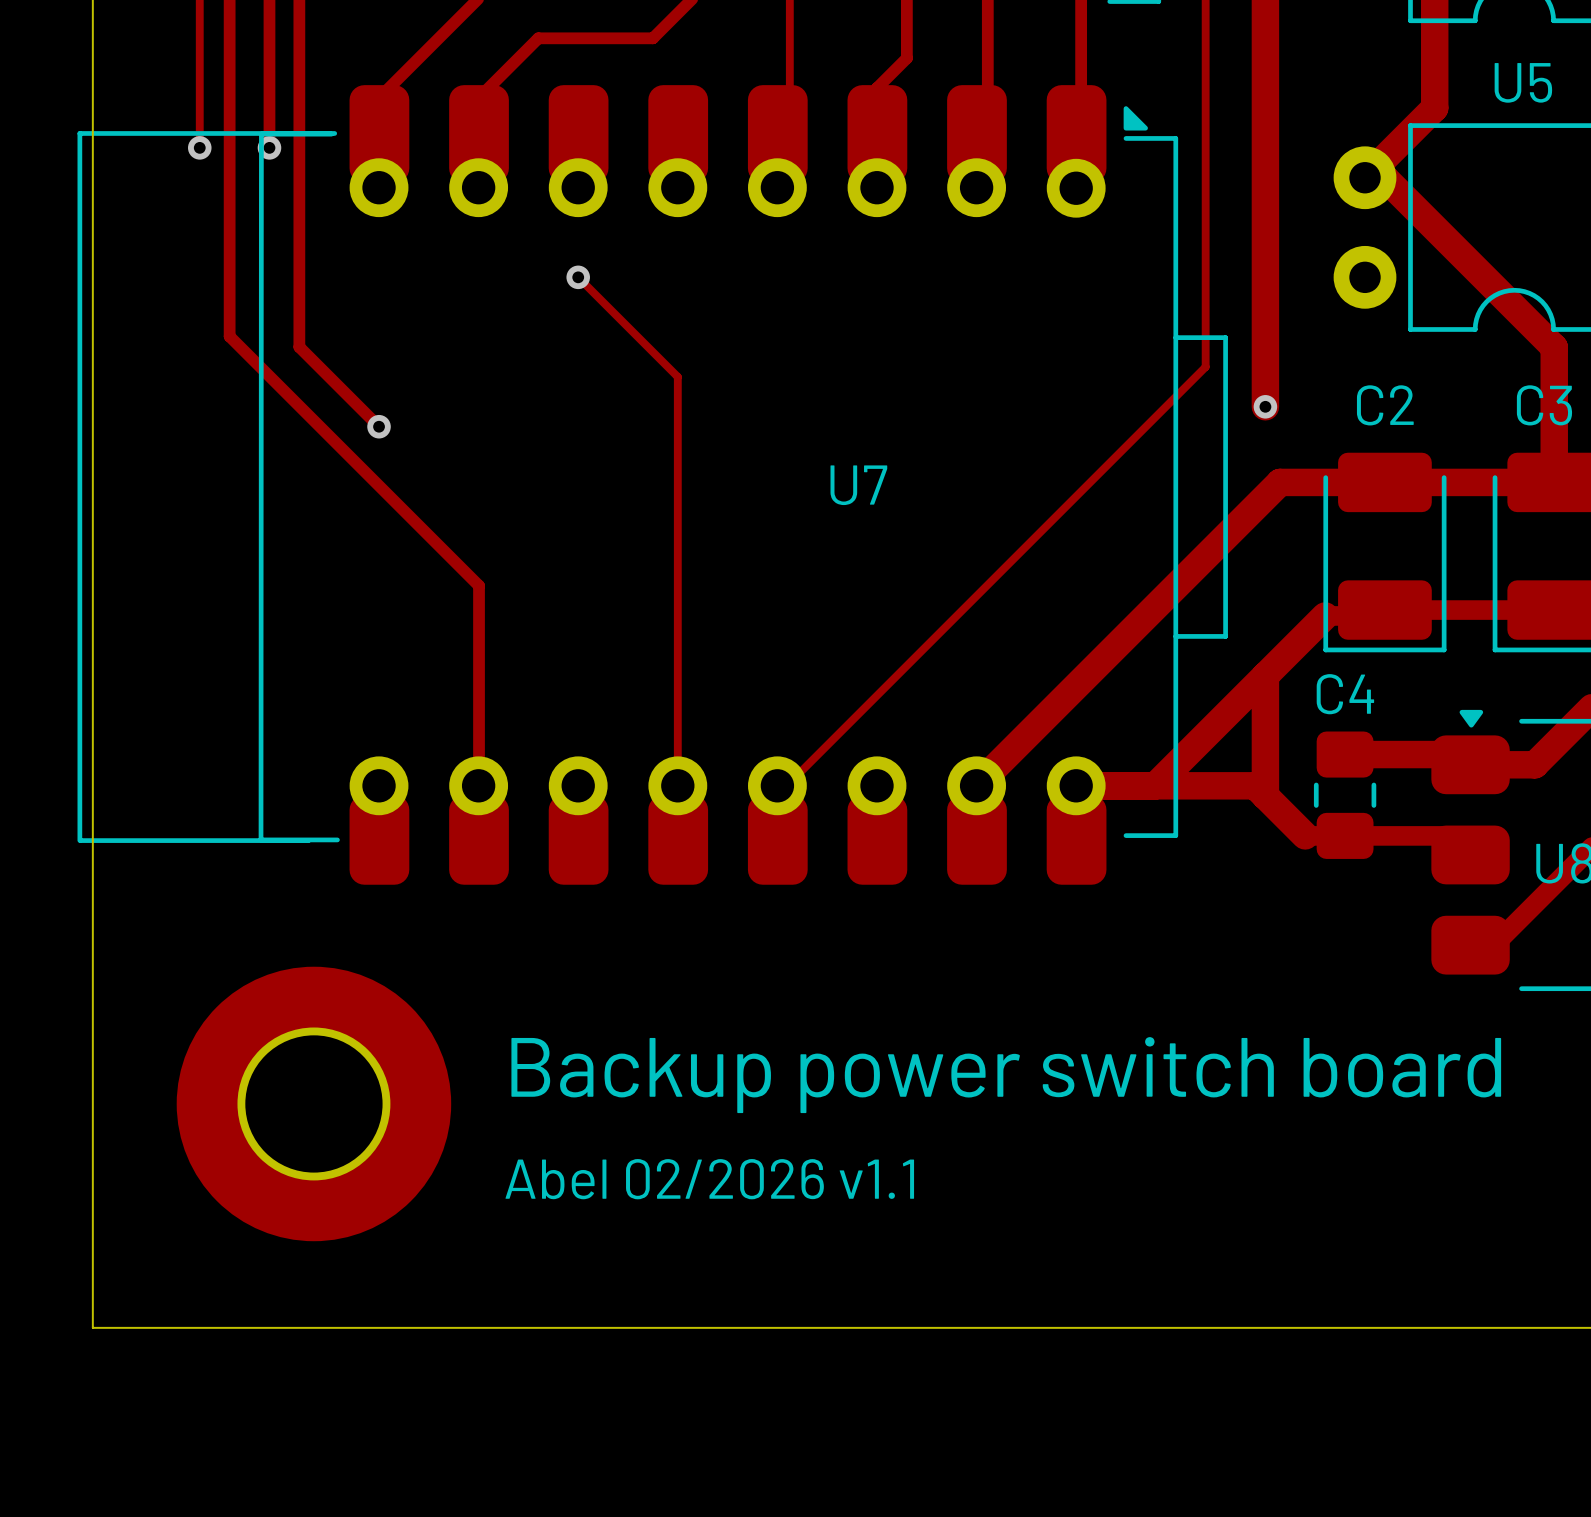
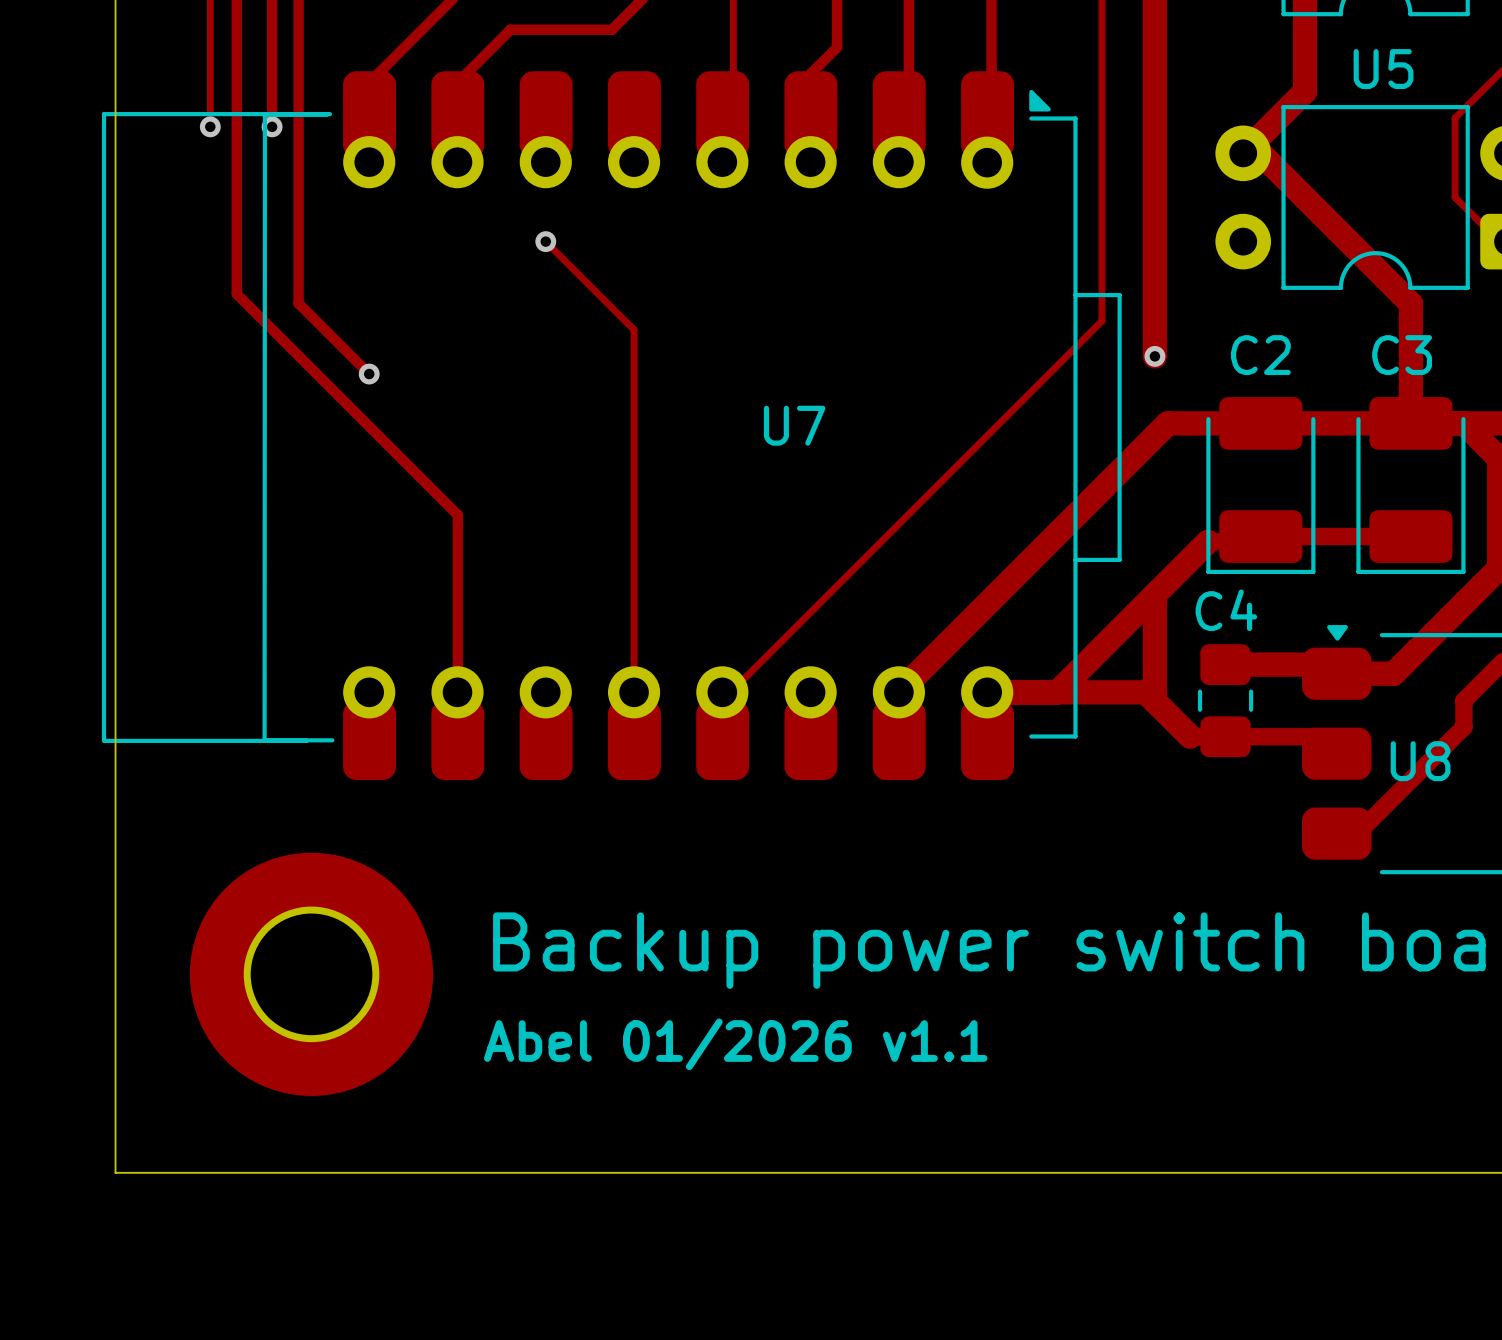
text: Abel 02/2026 v1.1 (709, 1179) -> Abel 01/2026 v1.1 (735, 1044)

